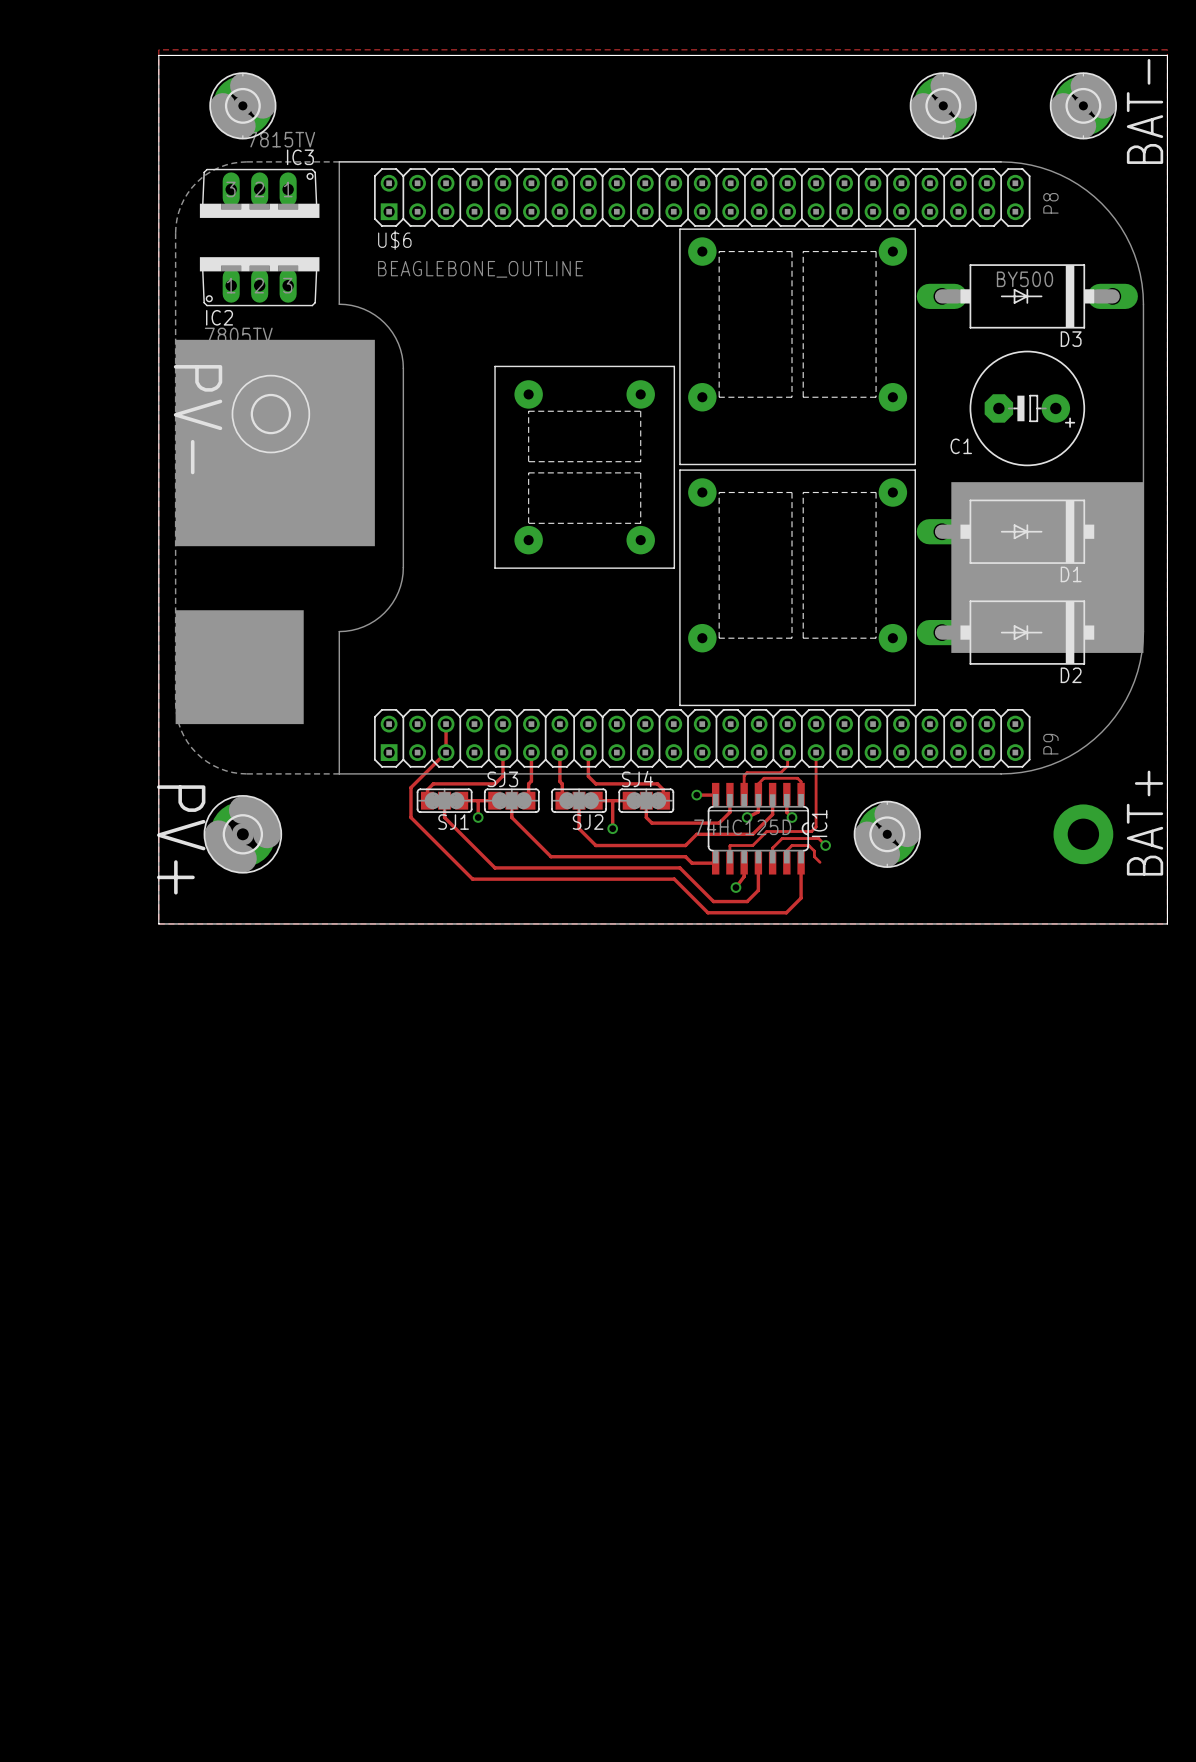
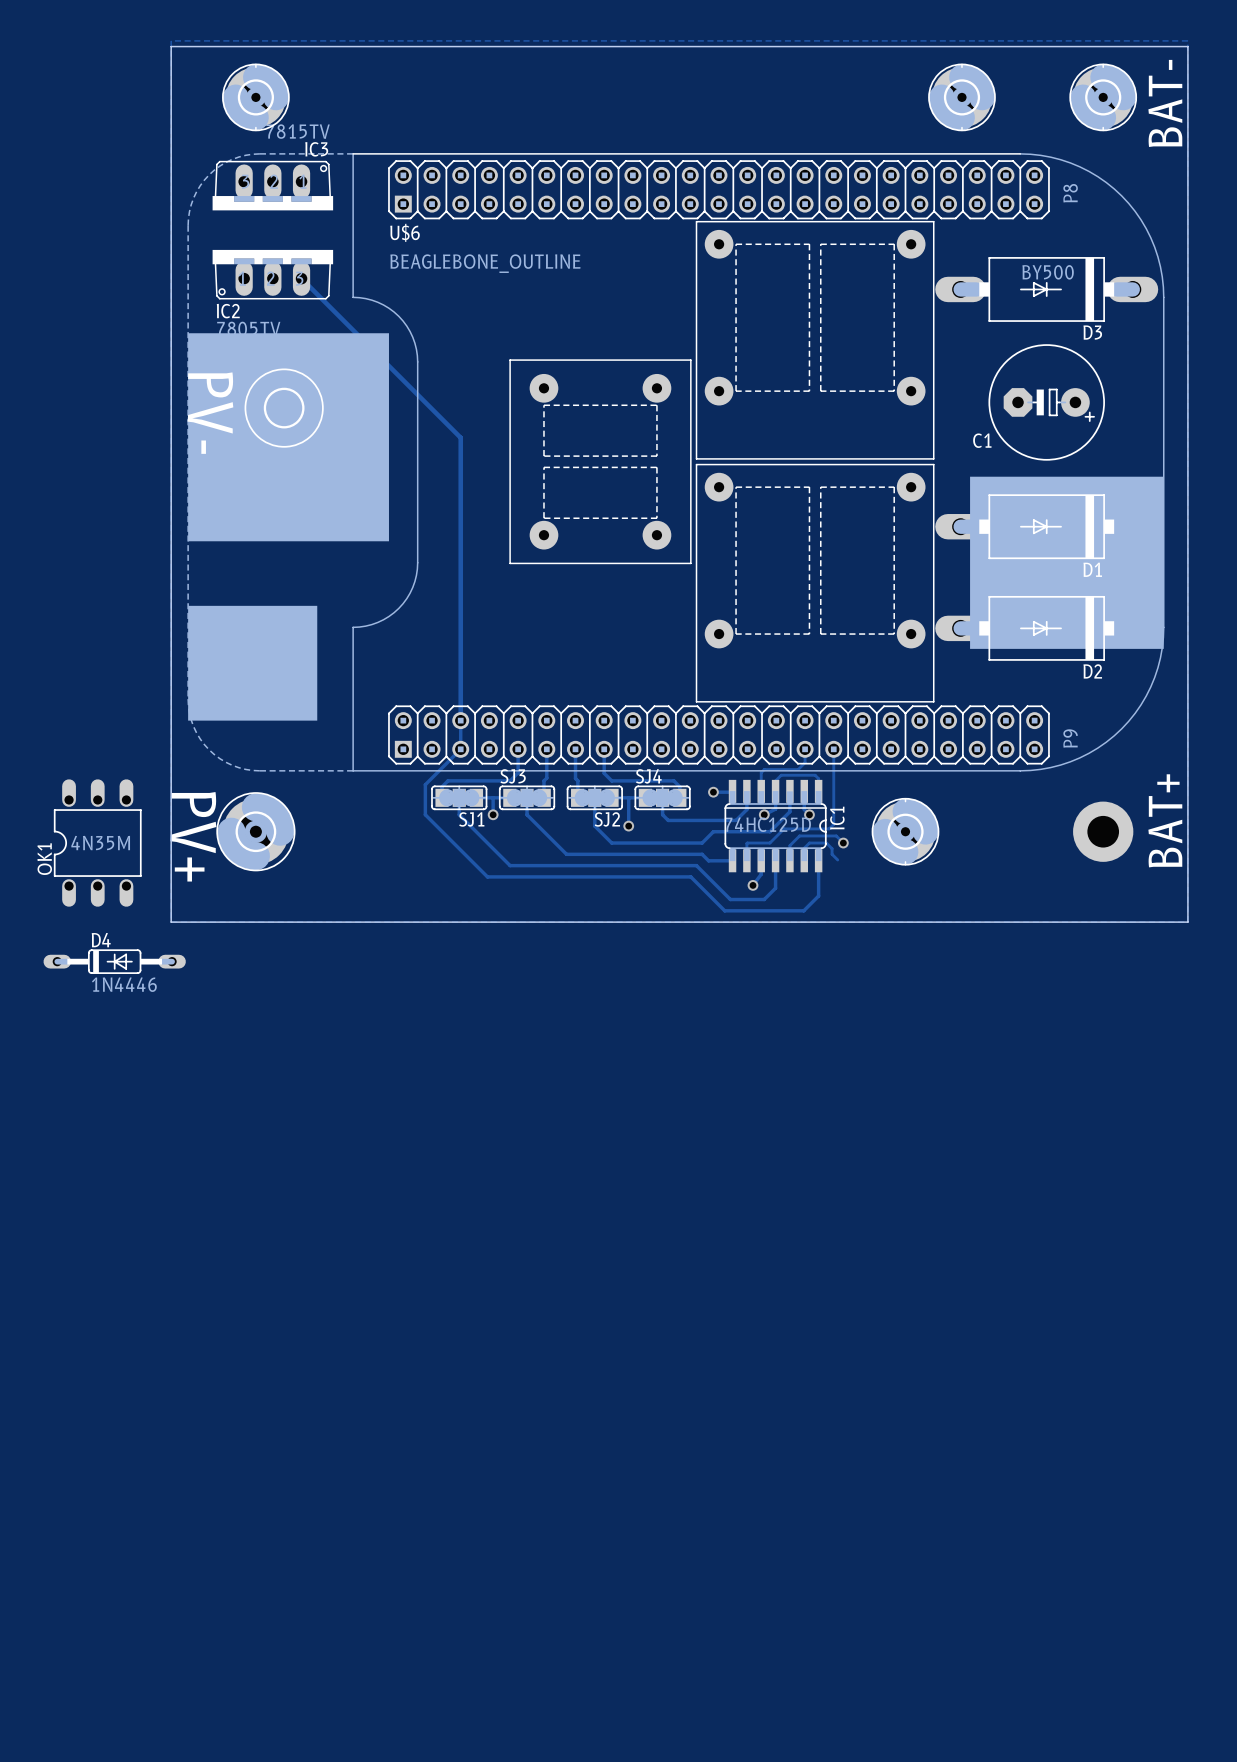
track: none -> (301, 278) (460, 437) (460, 720)
OK1: none -> 4N35M (97, 843)
D4: none -> 1N4446 (114, 961)

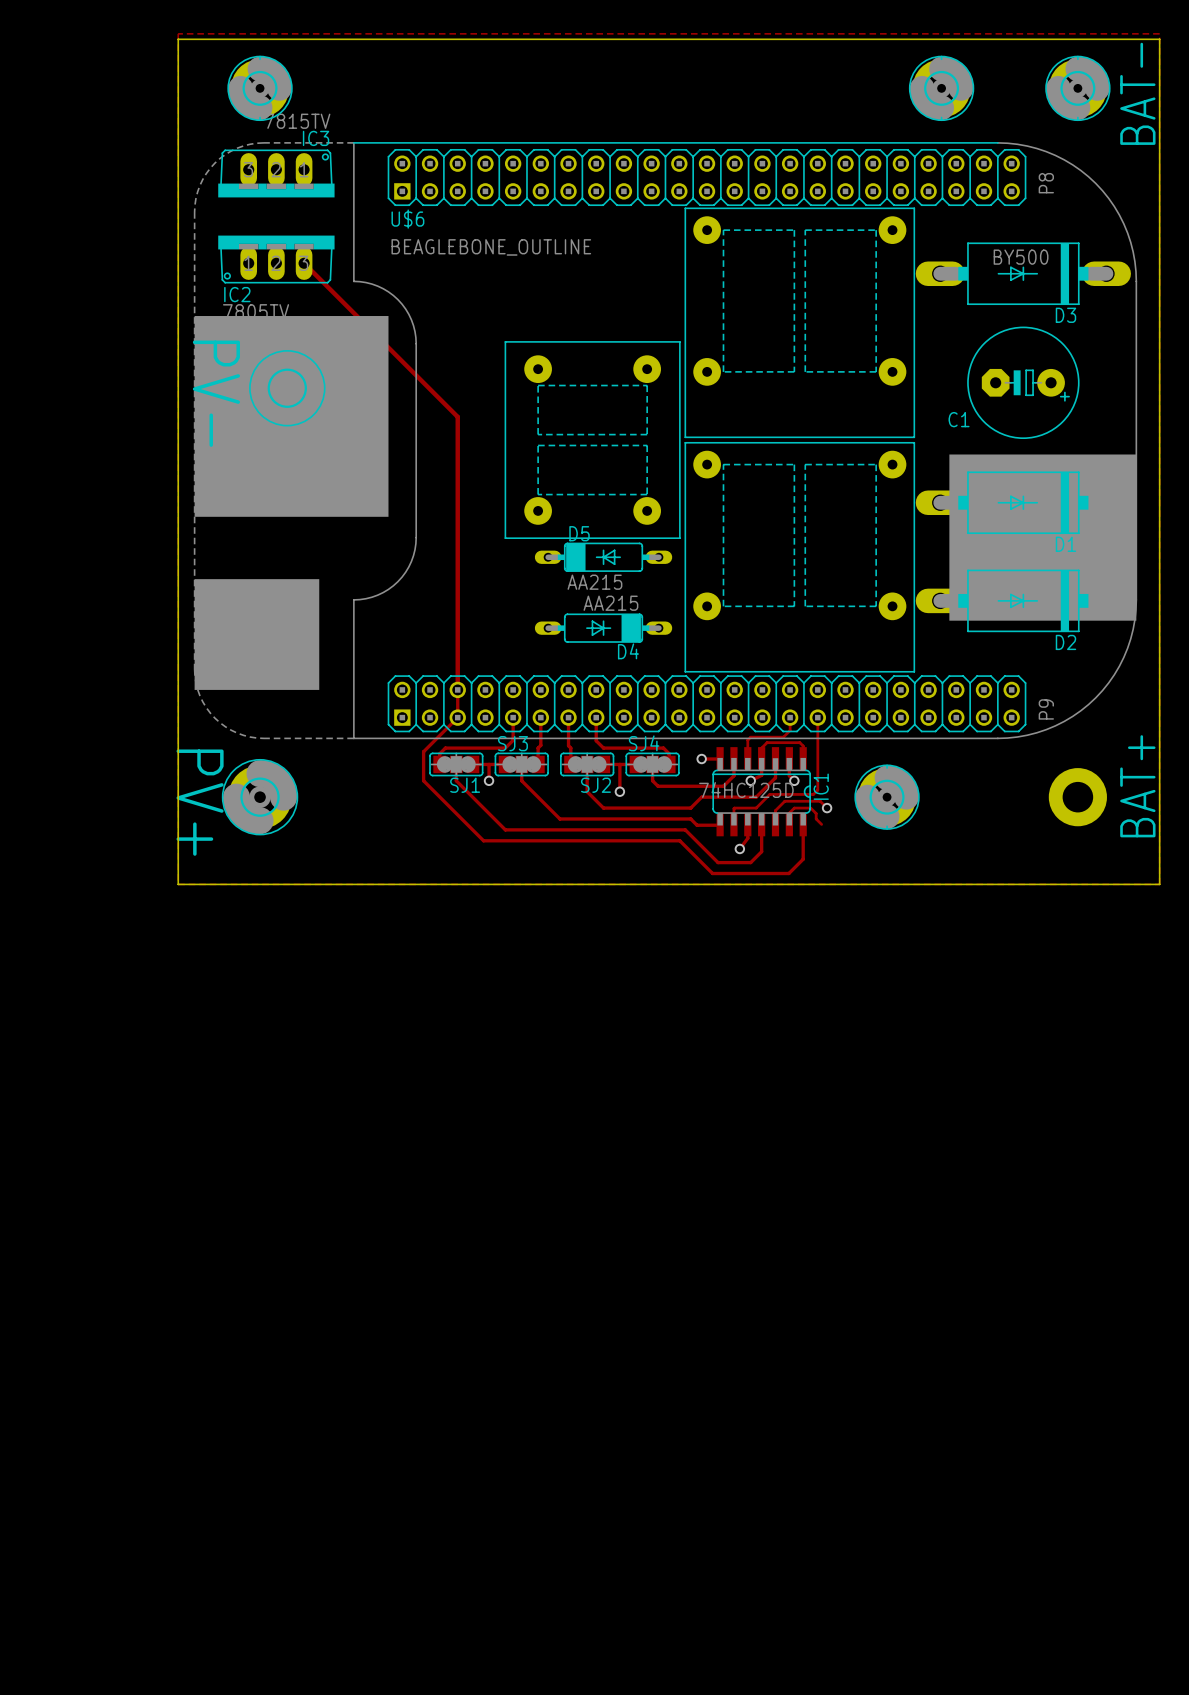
D5: none -> AA215 (603, 557)
OK1: 4N35M (97, 843) -> none
D4 name position: D4 (101, 940) -> D4 (628, 651)
D4 footprint: [43, 949, 186, 974] -> [534, 613, 673, 643]
D4 value: 1N4446 (124, 984) -> AA215 (610, 603)

